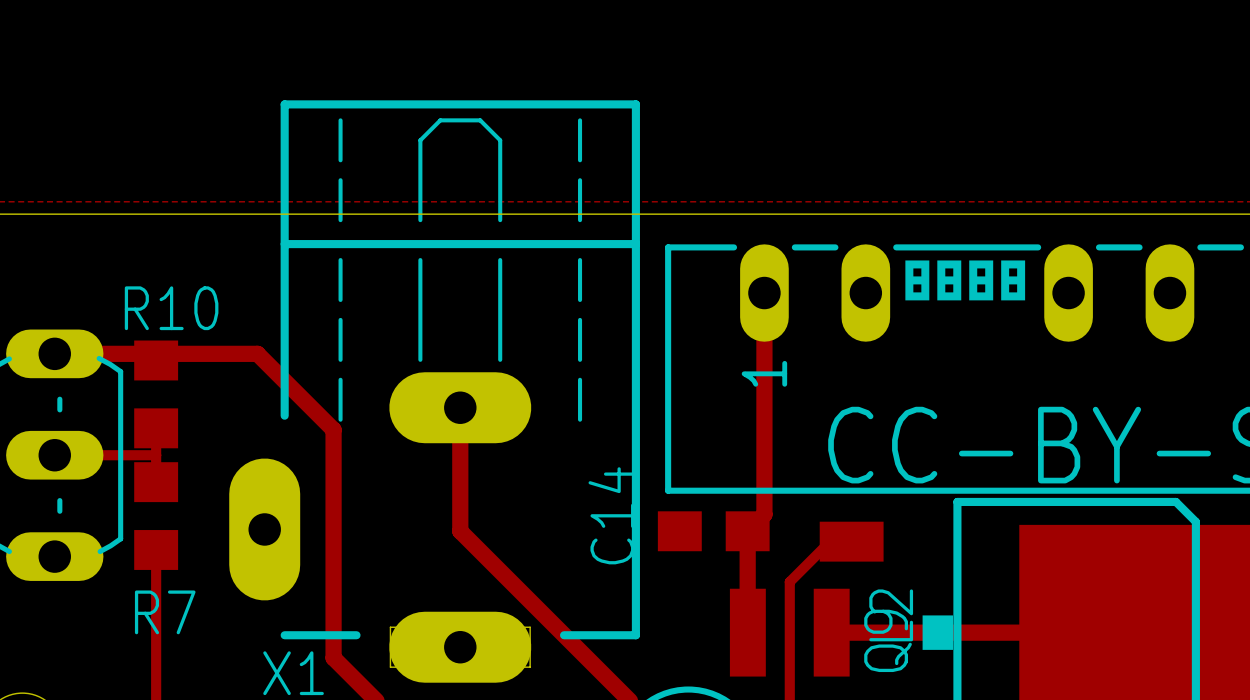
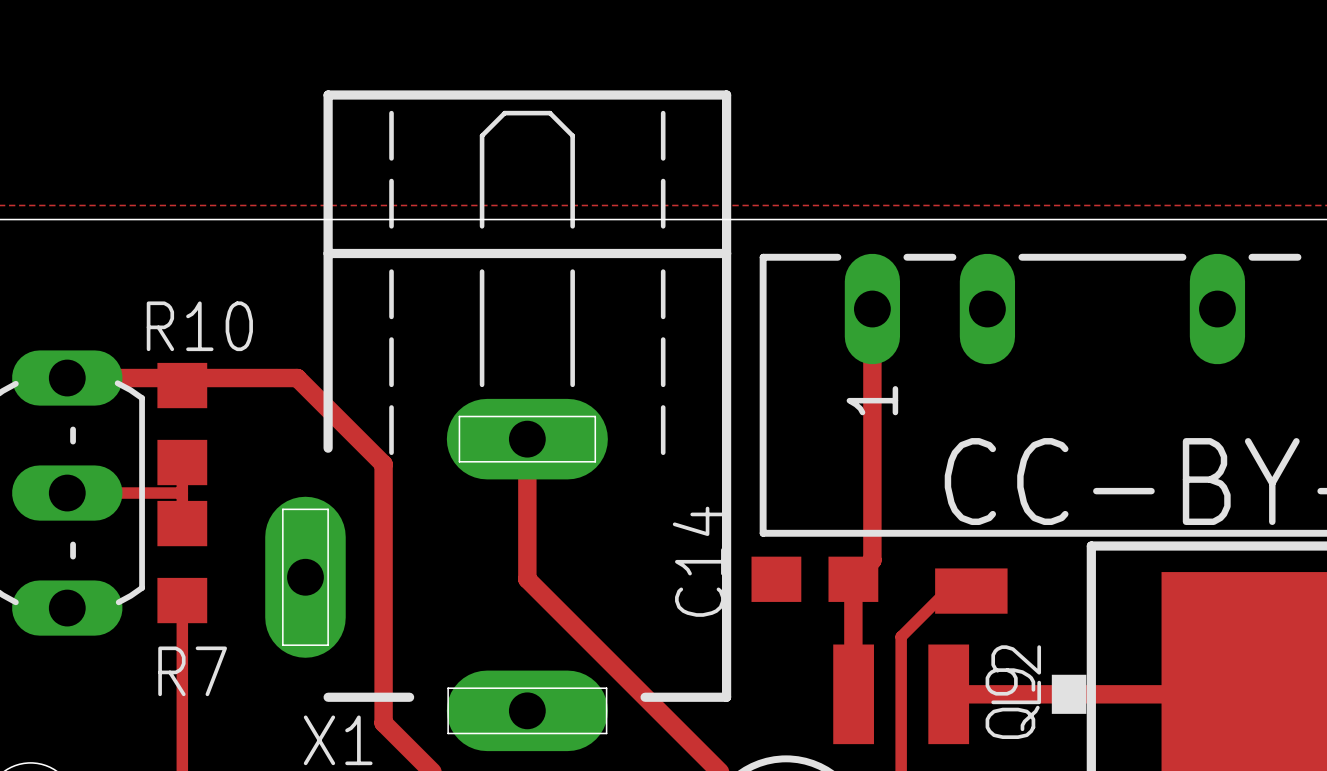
drawing: [905, 260, 1026, 301] -> none

